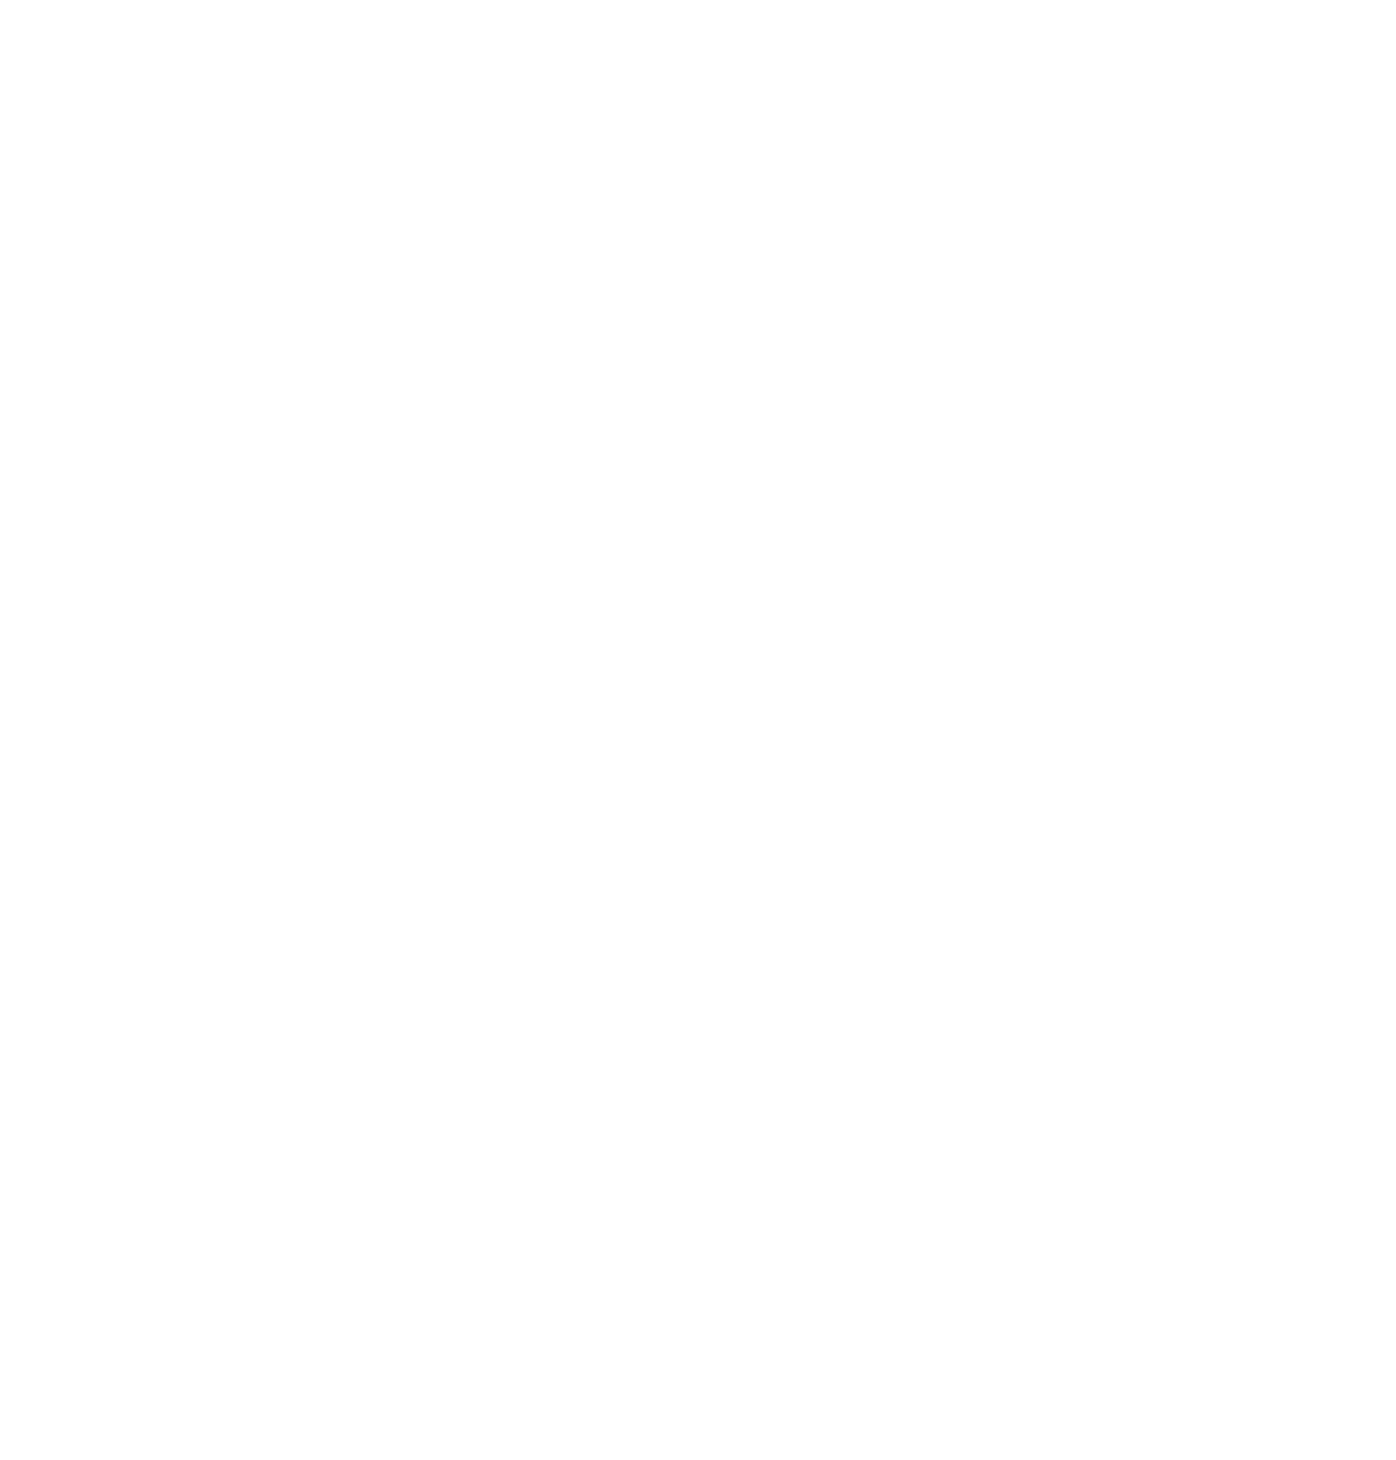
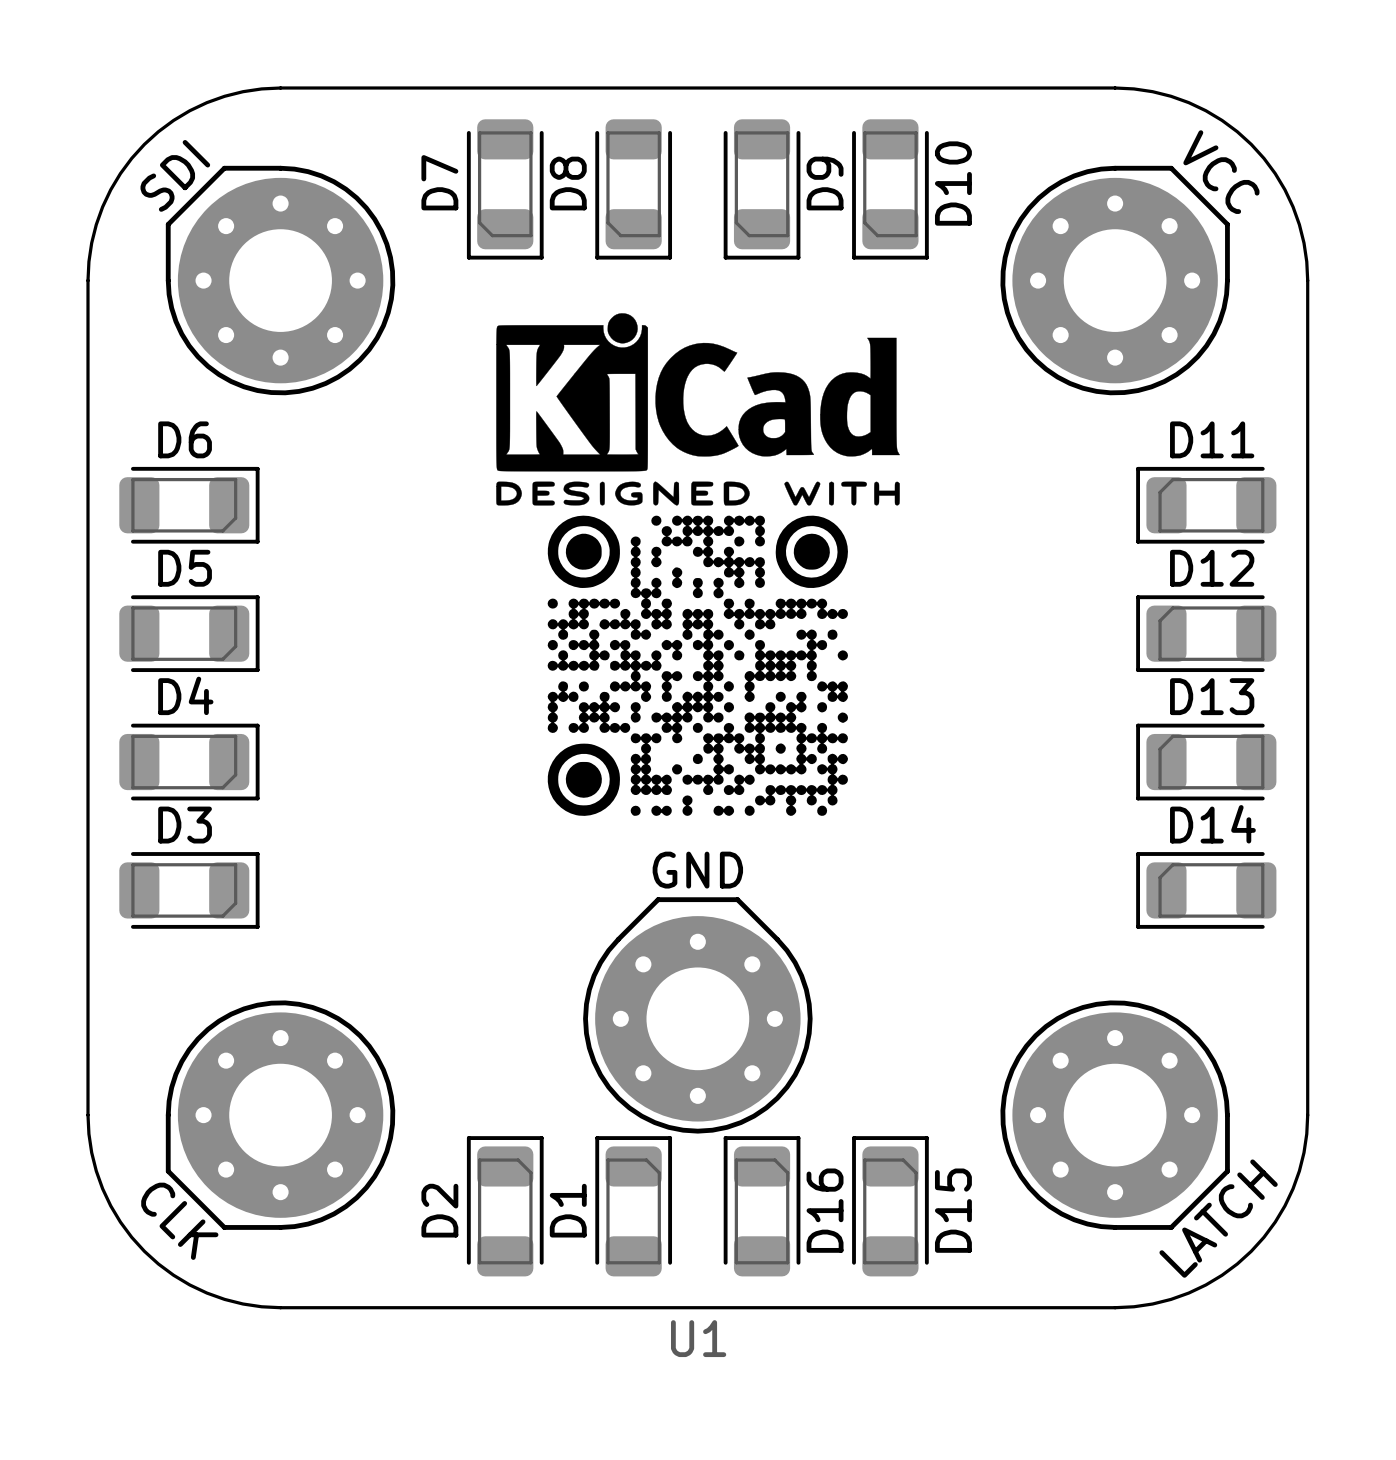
line: none -> (224, 168) (168, 224) (169, 294) (171, 308) (181, 334) (189, 345) (207, 366) (219, 374) (244, 386) (257, 390) (285, 392) (312, 388) (325, 383) (349, 369) (360, 360) (377, 338) (388, 312) (392, 285) (392, 271) (390, 257) (381, 231) (374, 219) (356, 197) (334, 181) (321, 175) (294, 169) (224, 168)
line: none -> (1115, 168) (1171, 168) (1227, 224) (1227, 280) (1226, 294) (1219, 321) (1213, 334) (1197, 356) (1176, 374) (1164, 381) (1138, 390) (1110, 392) (1096, 391) (1069, 383) (1057, 377) (1035, 360) (1018, 338) (1012, 325) (1004, 299) (1002, 285) (1005, 257) (1008, 244) (1021, 219) (1029, 207) (1039, 197) (1061, 181) (1087, 171) (1115, 168)
text: none -> VCC (1221, 172)
text: none -> SDI (175, 175)
D7: none -> (505, 189)
D8: none -> (633, 189)
D9: none -> (762, 189)
D10: none -> (890, 189)
drawing: none -> [496, 313, 900, 816]
D6: none -> (189, 505)
D11: none -> (1206, 505)
D5: none -> (189, 633)
D12: none -> (1206, 633)
U1: none -> (697, 697)
D4: none -> (189, 762)
D13: none -> (1206, 762)
text: none -> GND (697, 870)
D3: none -> (189, 890)
D14: none -> (1206, 890)
line: none -> (658, 899) (608, 950) (594, 975) (586, 1004) (586, 1033) (589, 1047) (594, 1061) (608, 1087) (629, 1107) (641, 1116) (668, 1127) (683, 1130) (697, 1131) (726, 1127) (754, 1116) (766, 1107) (786, 1087) (795, 1074) (806, 1047) (809, 1033) (810, 1018) (806, 989) (801, 975) (786, 950) (737, 899) (658, 899)
line: none -> (168, 1115) (168, 1171) (224, 1227) (280, 1227) (308, 1224) (334, 1213) (345, 1206) (366, 1187) (381, 1164) (386, 1151) (390, 1138) (392, 1110) (388, 1083) (383, 1069) (377, 1057) (360, 1035) (349, 1026) (325, 1012) (299, 1004) (285, 1002) (271, 1003) (244, 1008) (231, 1014) (207, 1029) (189, 1049) (175, 1074) (169, 1101) (168, 1115)
line: none -> (1227, 1115) (1227, 1171) (1171, 1227) (1115, 1227) (1087, 1224) (1061, 1213) (1039, 1197) (1029, 1187) (1021, 1176) (1008, 1151) (1005, 1138) (1002, 1110) (1004, 1096) (1012, 1069) (1026, 1046) (1035, 1035) (1046, 1026) (1069, 1012) (1083, 1007) (1110, 1002) (1138, 1005) (1151, 1008) (1176, 1021) (1197, 1039) (1213, 1061) (1219, 1074) (1226, 1101) (1227, 1115)
D2: none -> (505, 1206)
D1: none -> (633, 1206)
D16: none -> (762, 1206)
D15: none -> (890, 1206)
text: none -> LATCH (1218, 1218)
text: none -> CLK (179, 1221)

